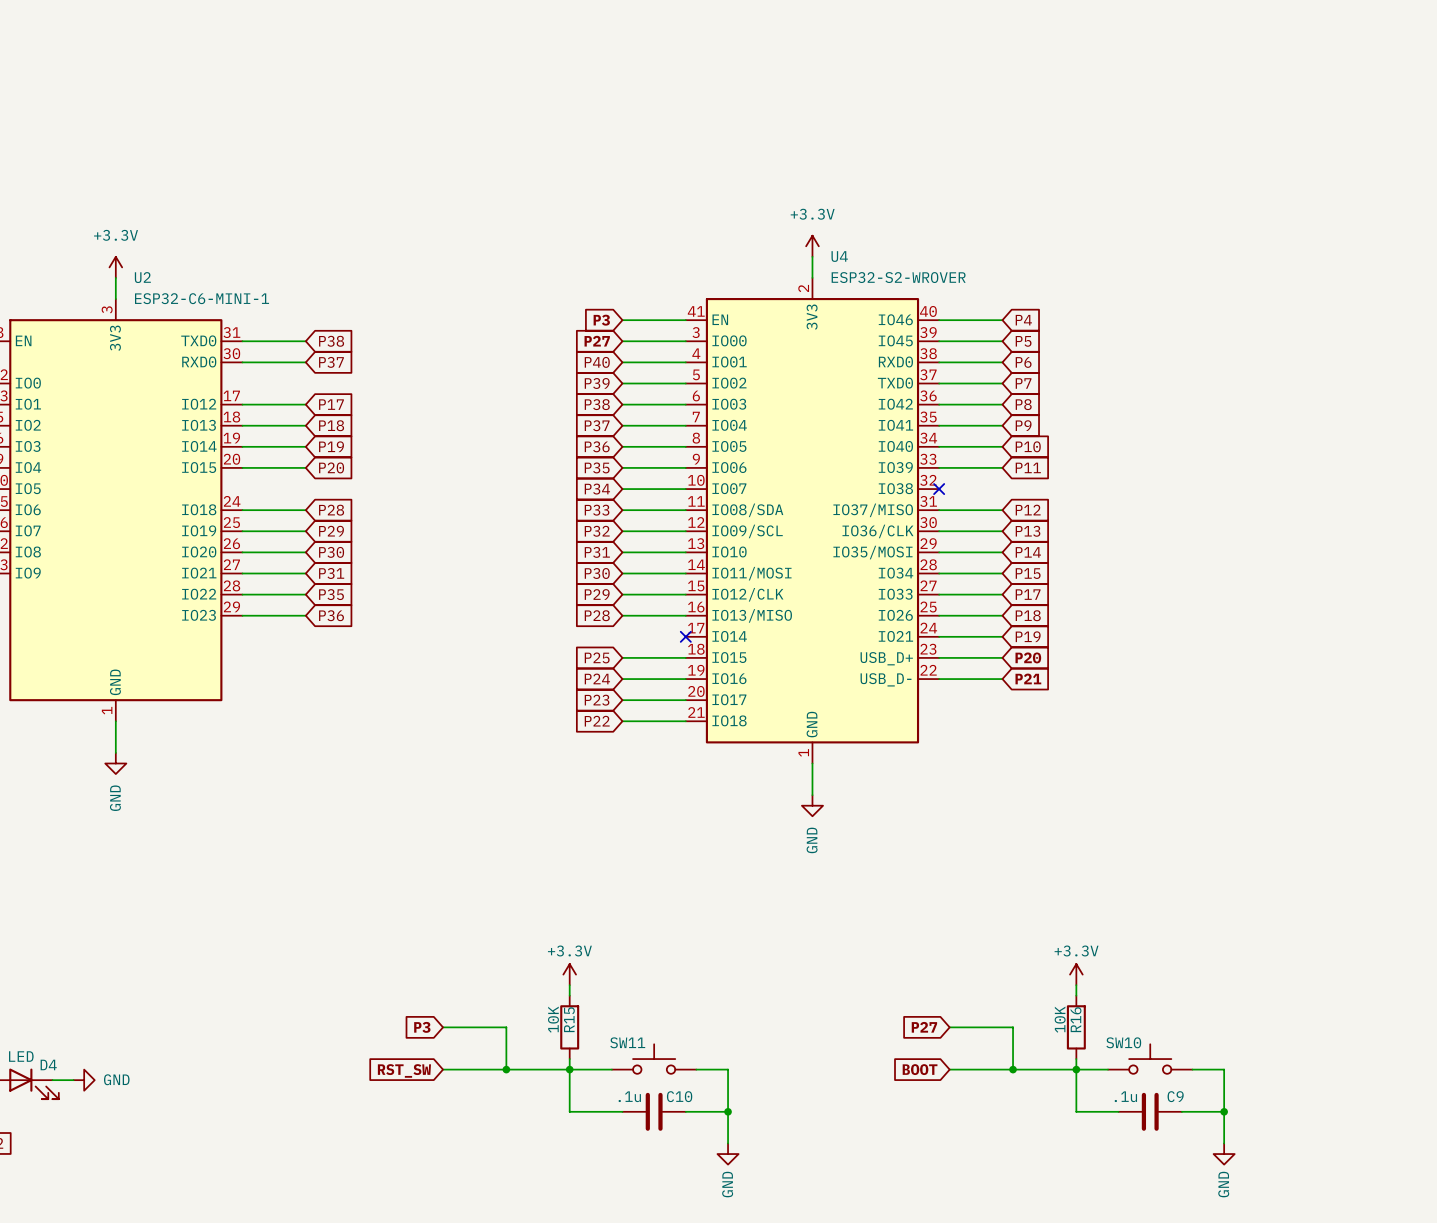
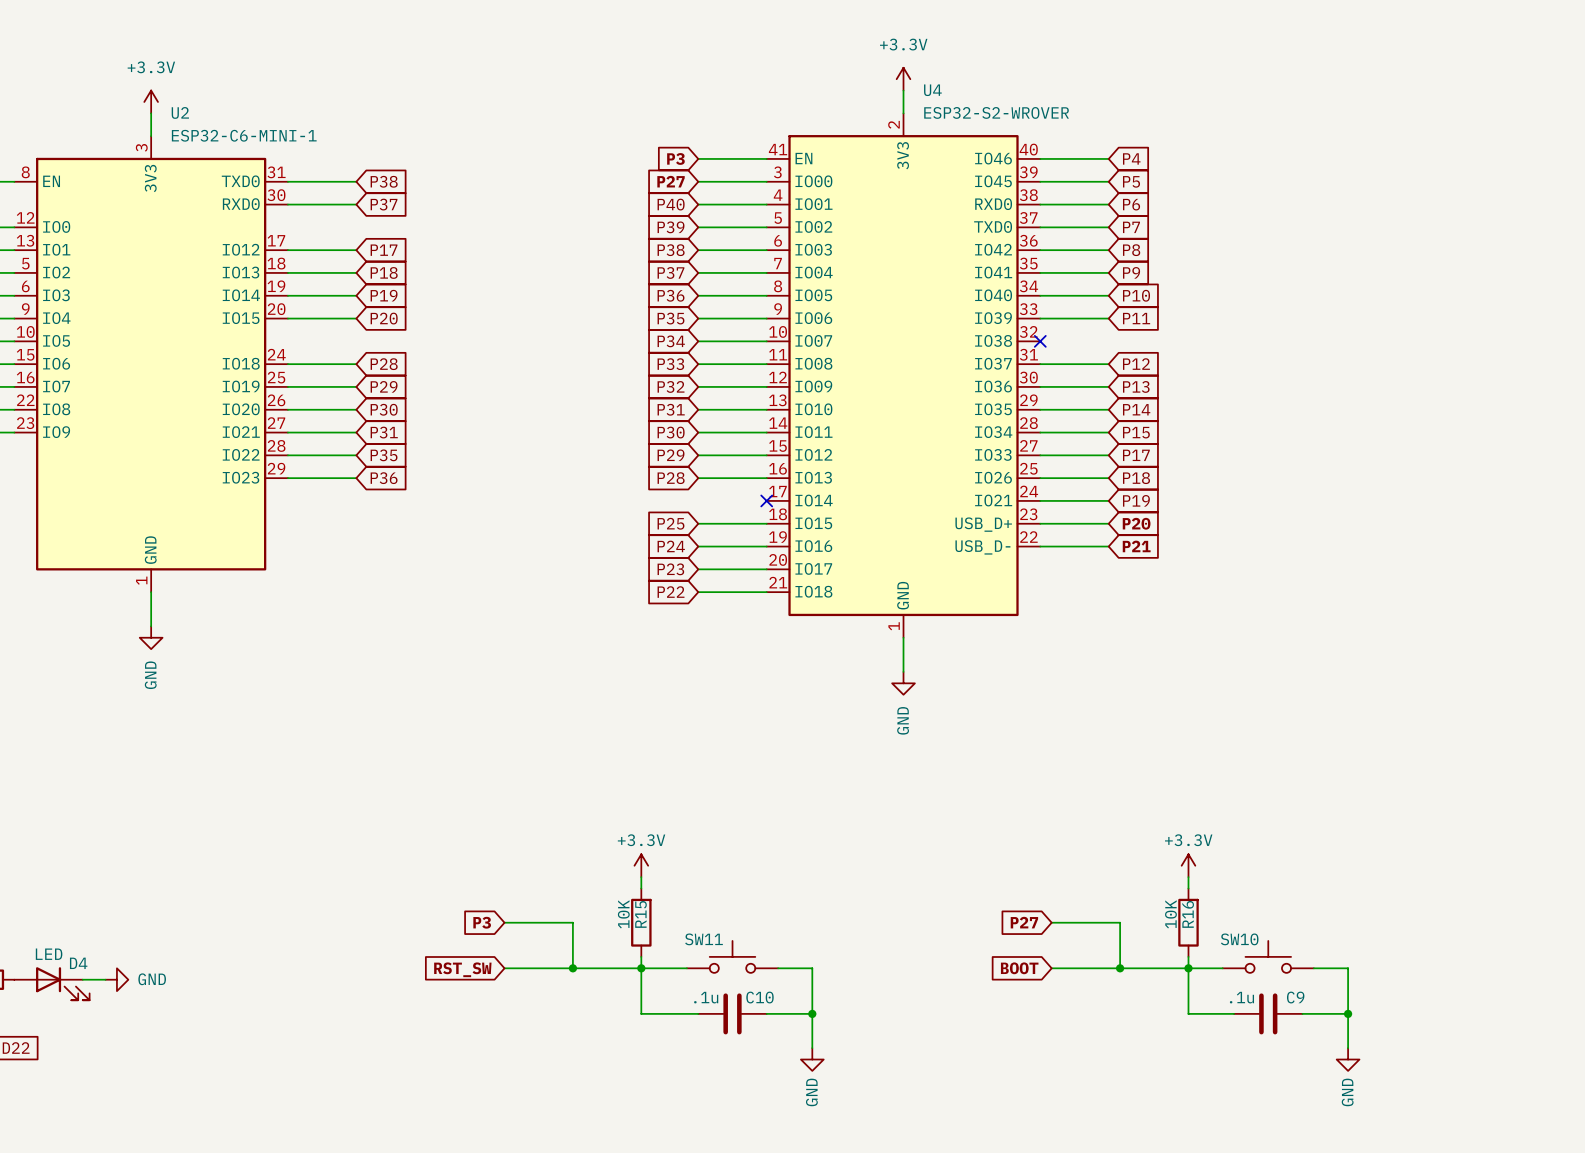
U4 pin name: IO08/SDA (747, 510) -> IO08 (813, 363)
U4 pin name: IO37/MISO (873, 510) -> IO37 (993, 363)
U4 pin name: IO09/SCL (747, 531) -> IO09 (813, 386)
U4 pin name: IO36/CLK (877, 531) -> IO36 (993, 386)
U4 pin name: IO35/MOSI (872, 552) -> IO35 (993, 409)
U4 pin name: IO11/MOSI (751, 573) -> IO11 (813, 432)
U4 pin name: IO12/CLK (747, 594) -> IO12 (813, 454)
U4 pin name: IO13/MISO (752, 615) -> IO13 (813, 477)

